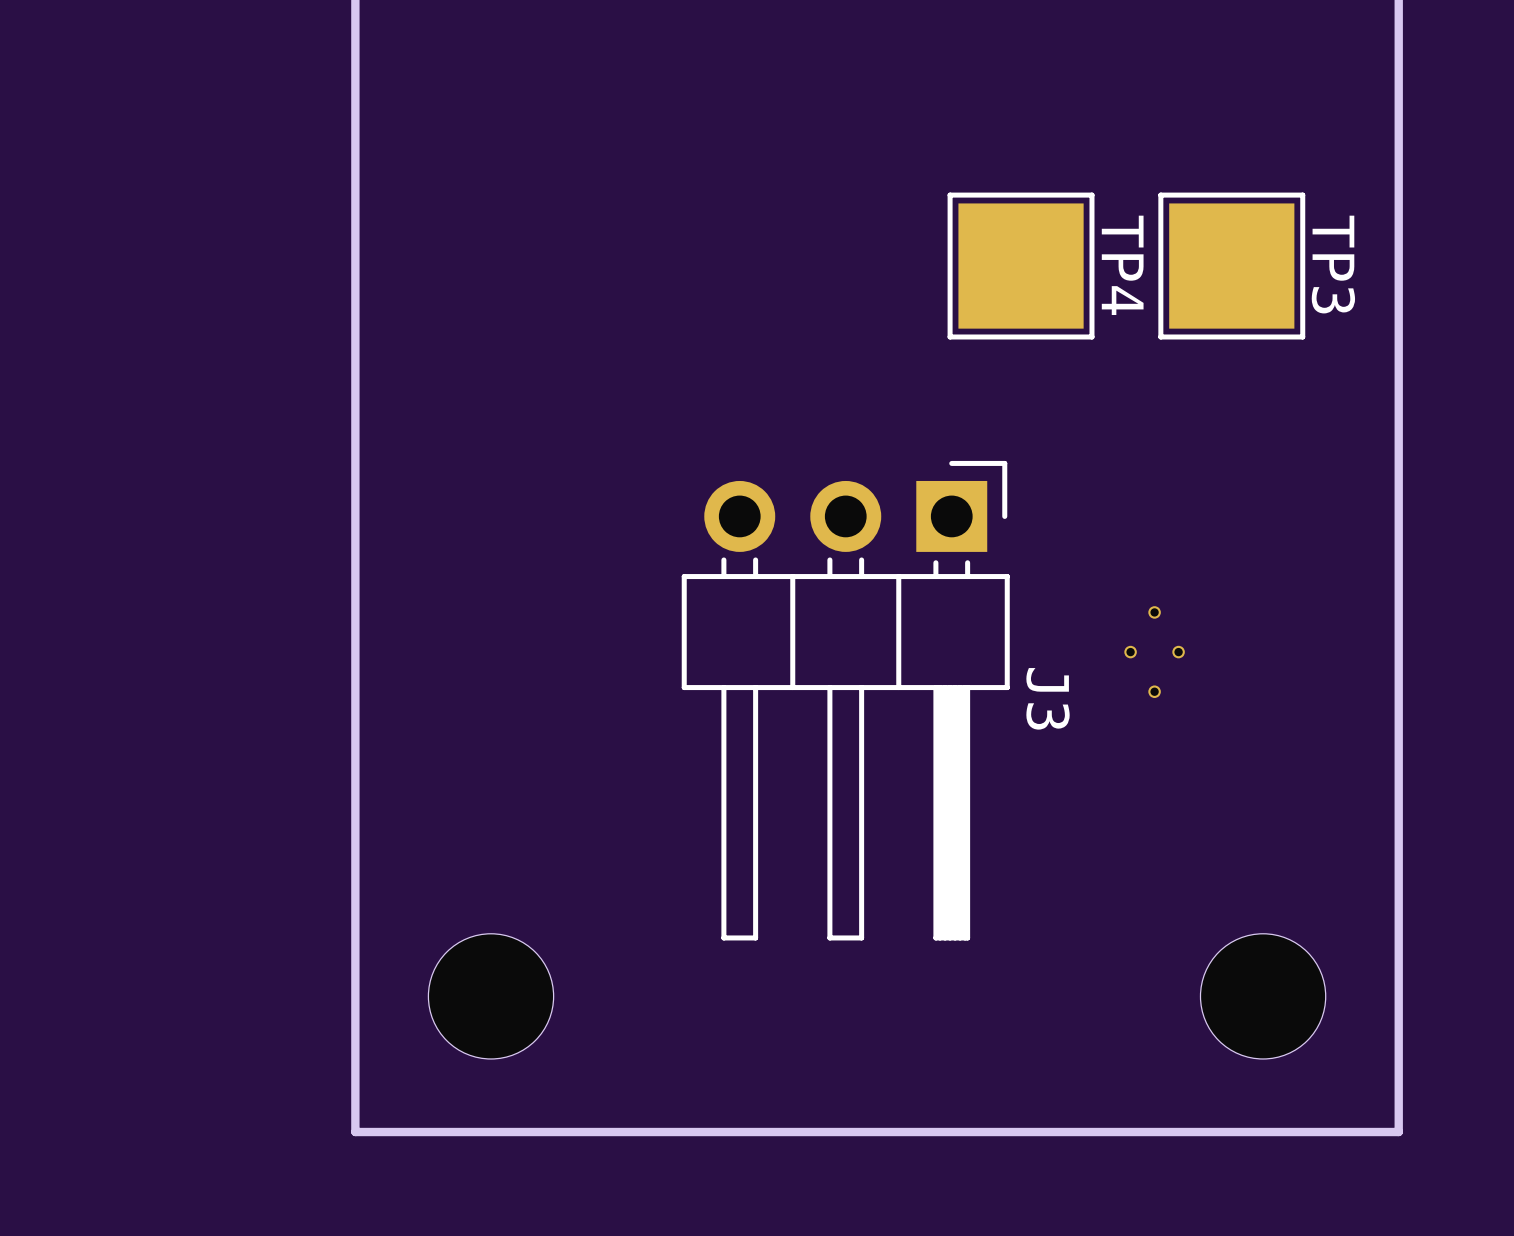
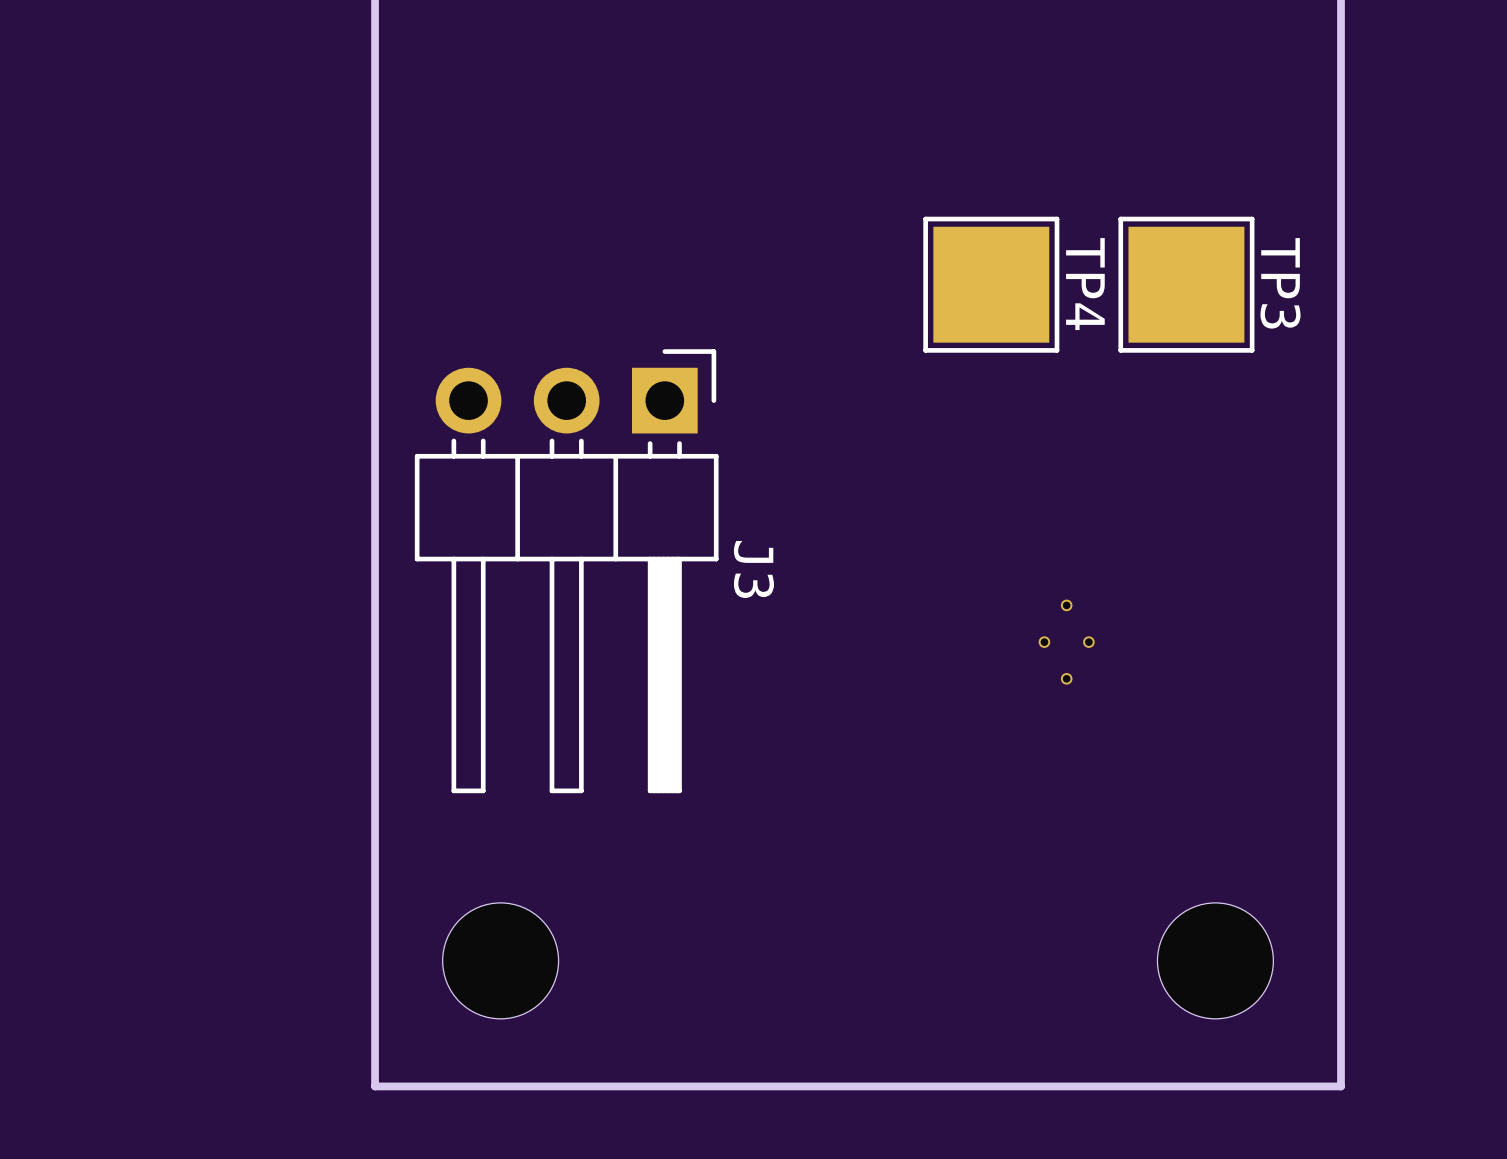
part position: (1154, 652) -> (1066, 642)
J3 position: (845, 700) -> (566, 571)

